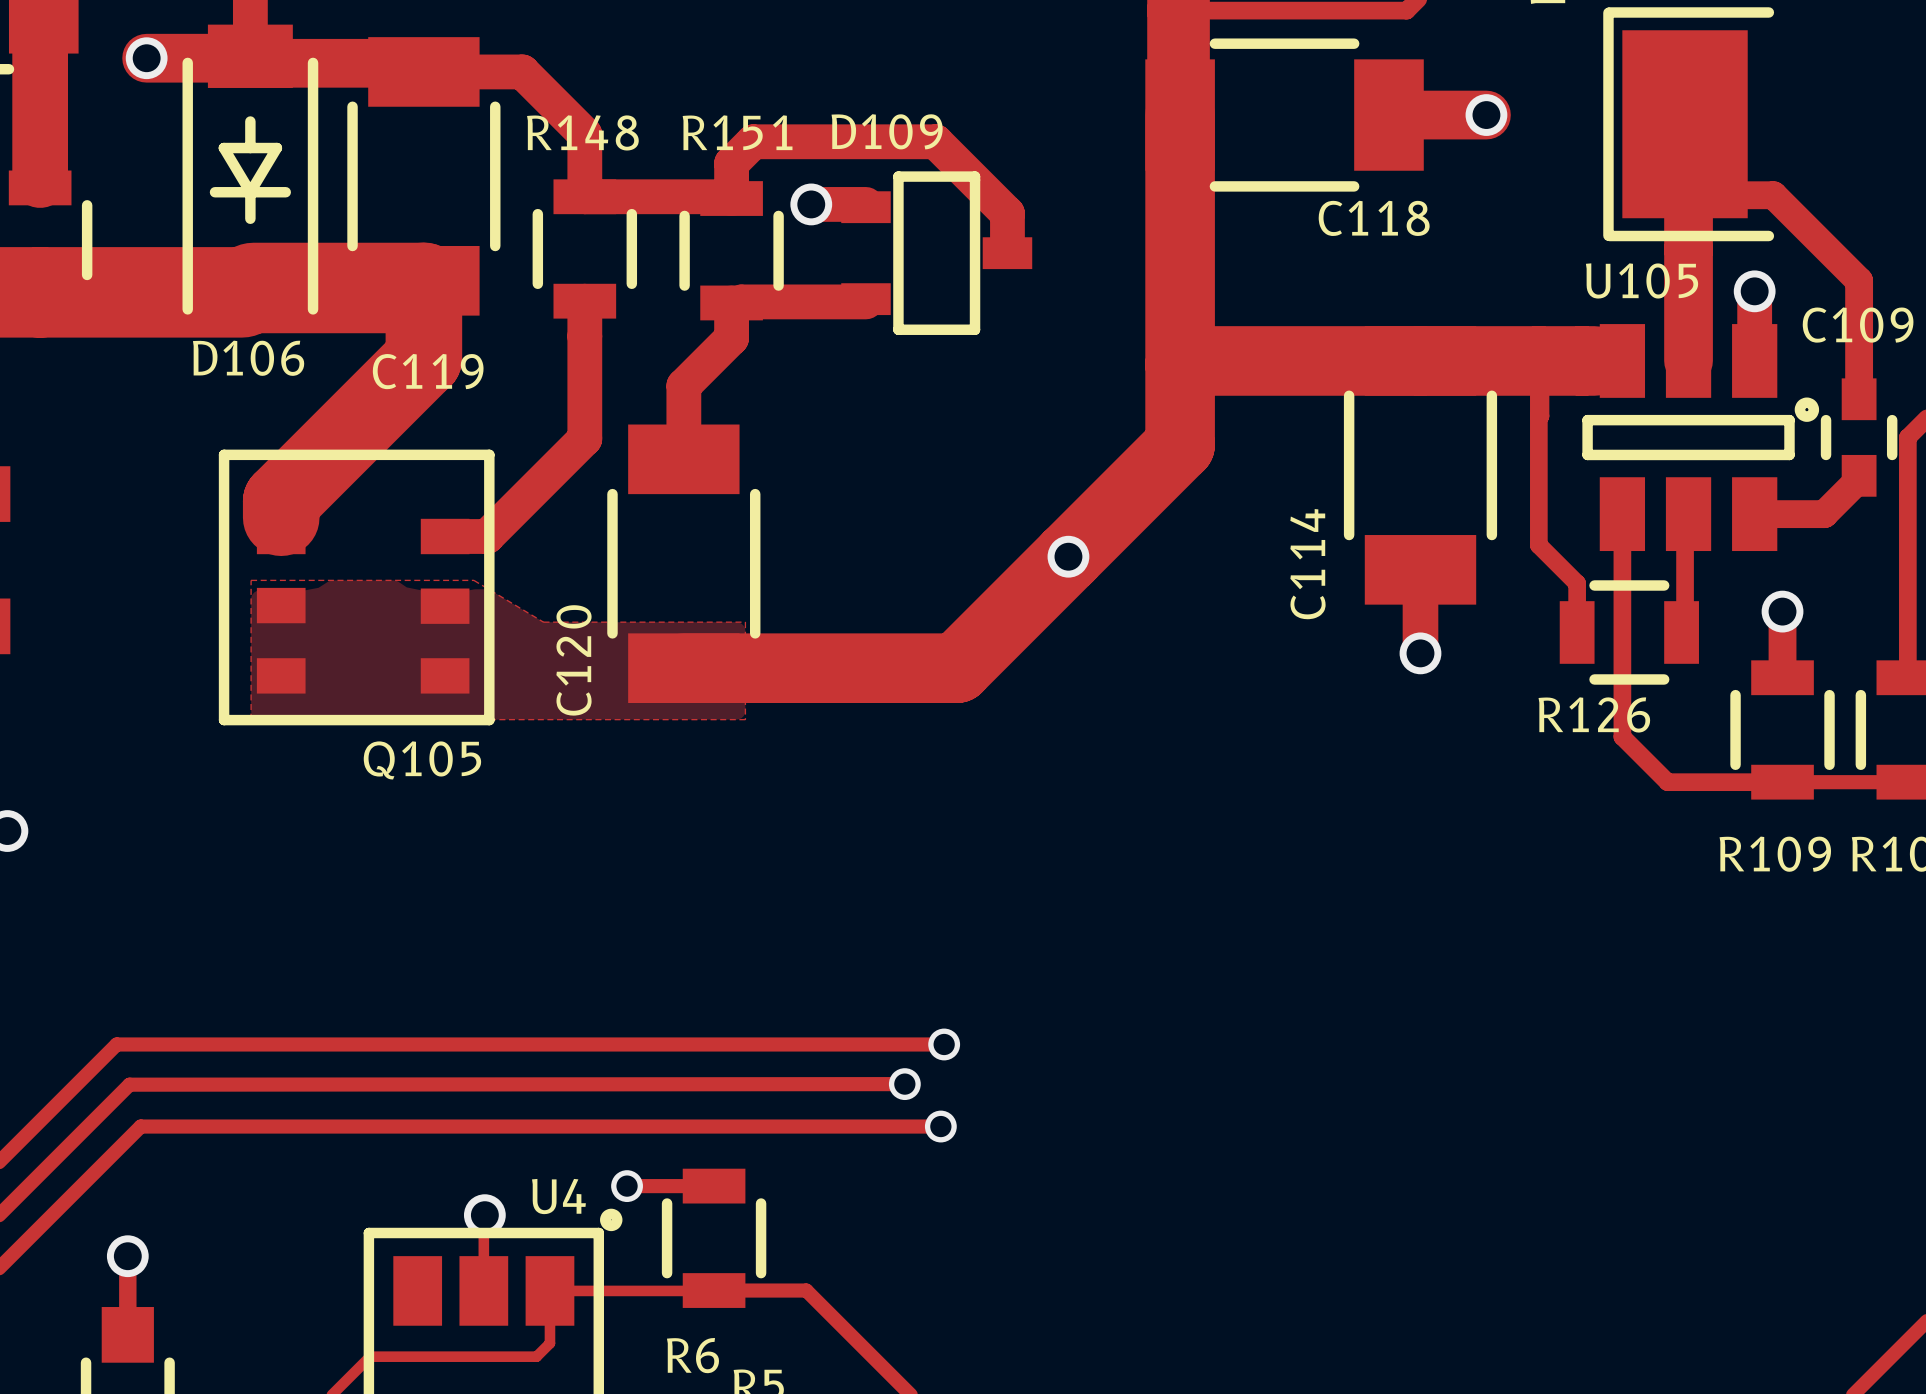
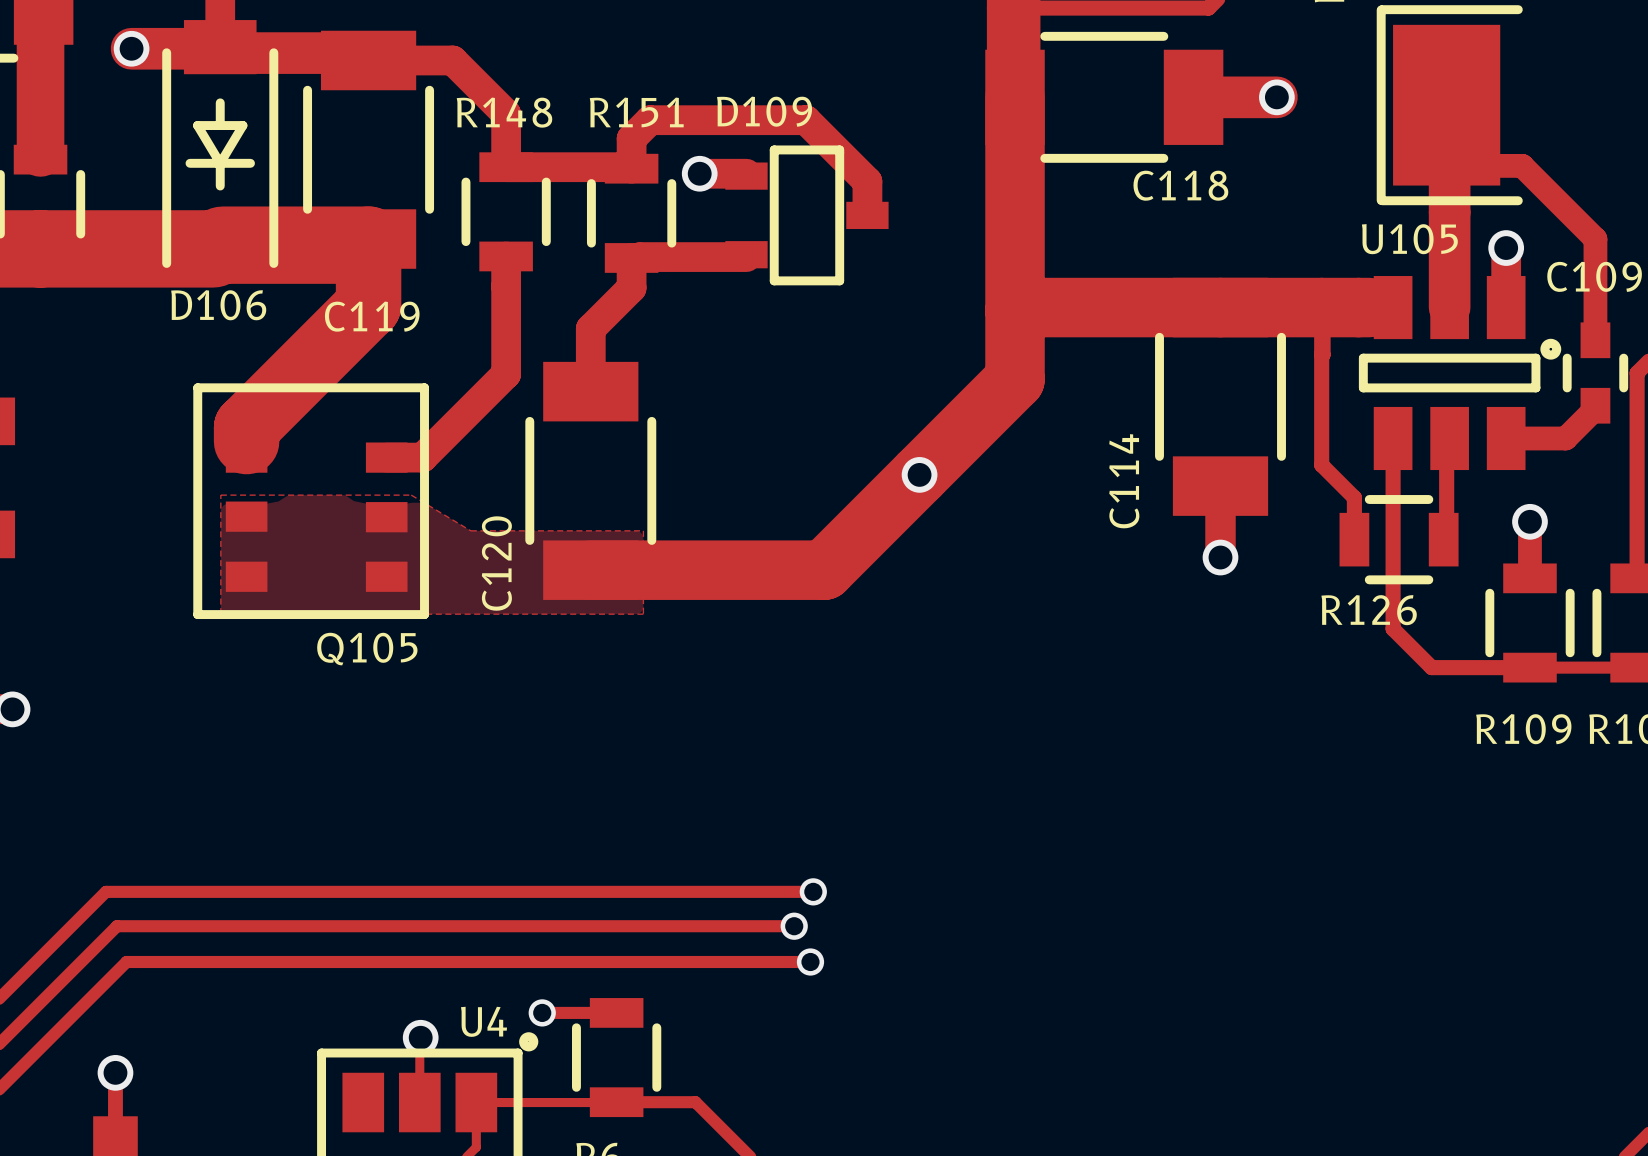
track: (904, 1084) (129, 1084) -> (794, 926) (116, 926)
via position: (904, 1084) -> (794, 926)

